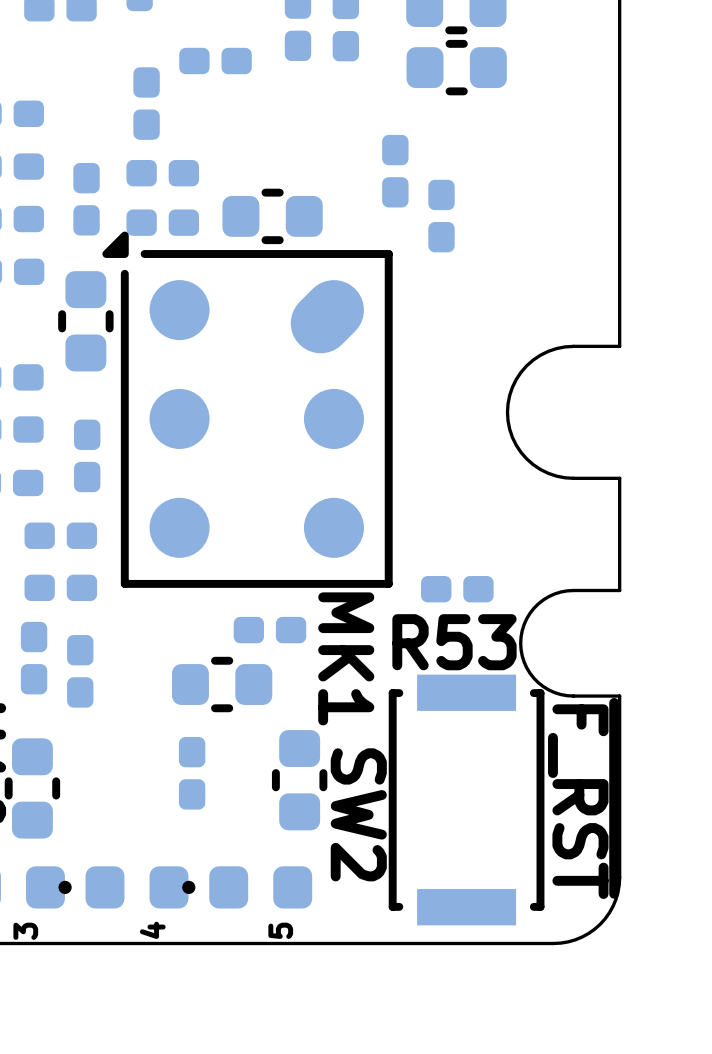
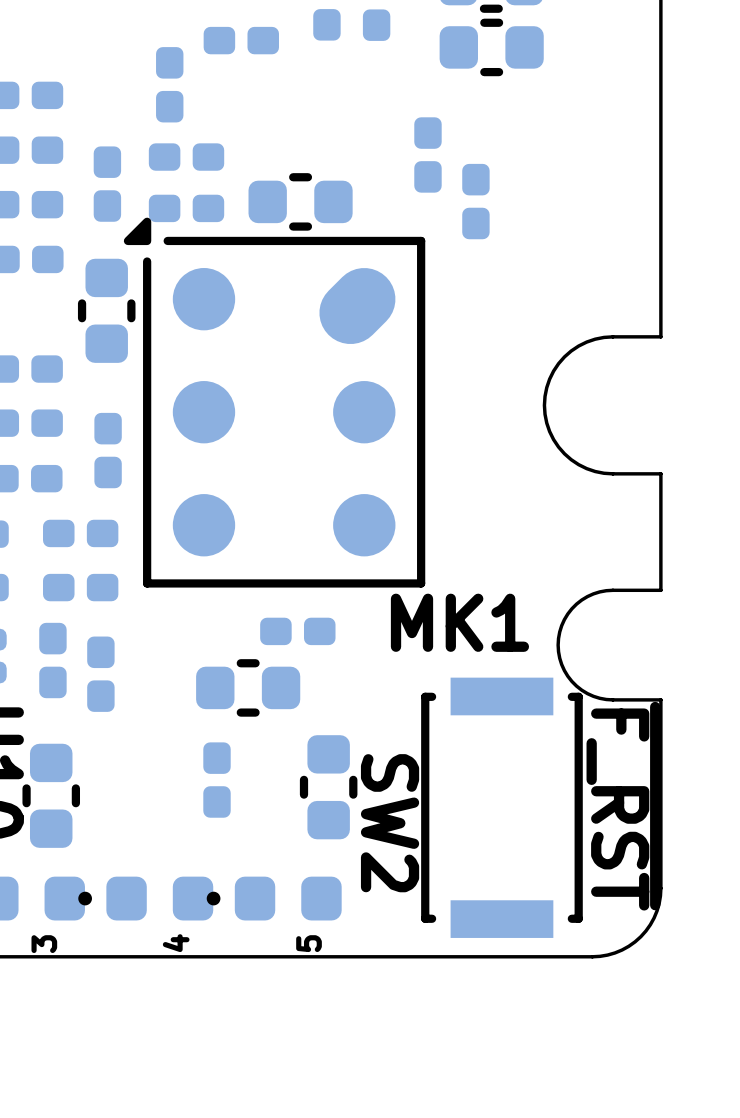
R53: (457, 589) -> none
MK1 name rotation: 0° (346, 658) -> 90° counterclockwise (459, 622)

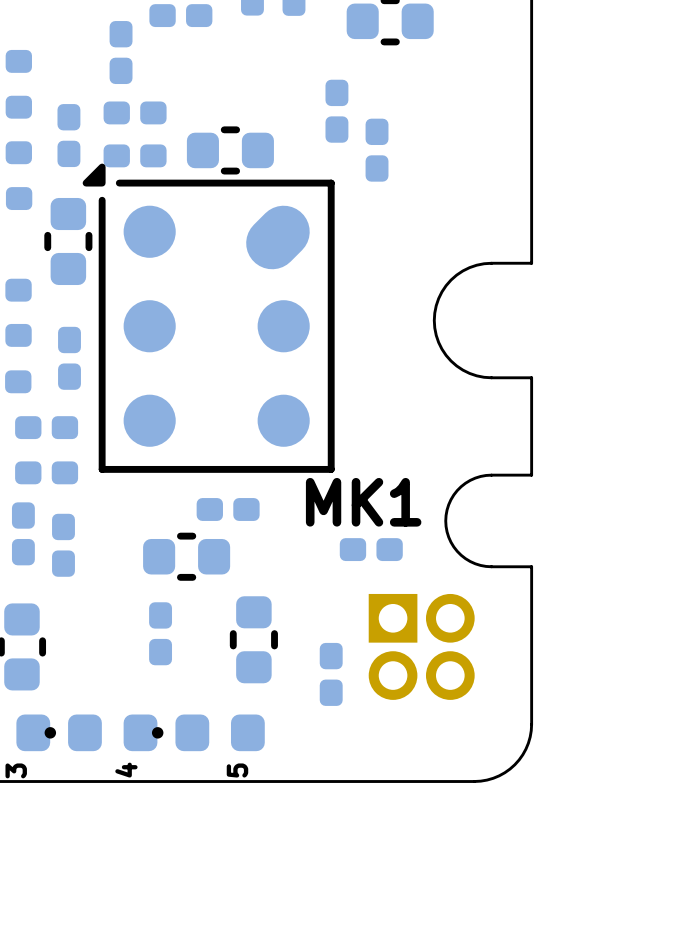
part: none -> (371, 549)
part: none -> (421, 646)
text: ~{F_RST} (623, 806) -> none
SW2: (501, 807) -> none
part: none -> (331, 674)

